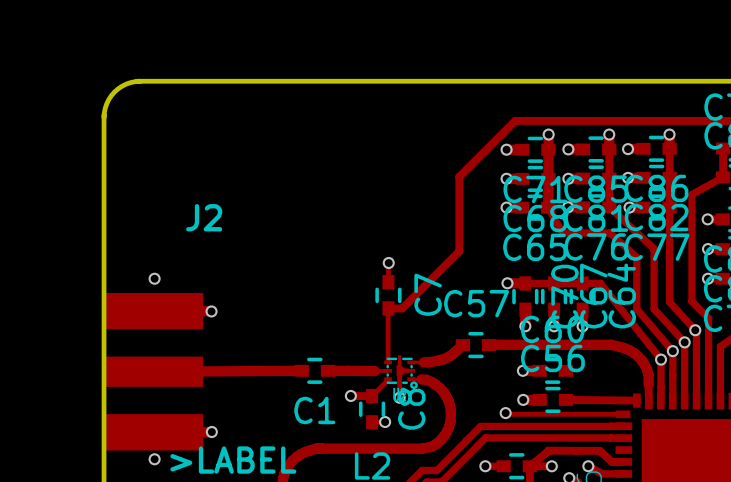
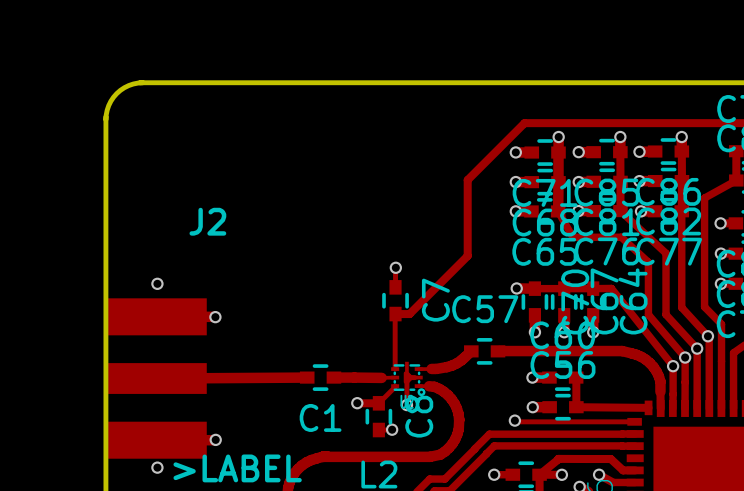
track: none -> (576, 377) (576, 407)

